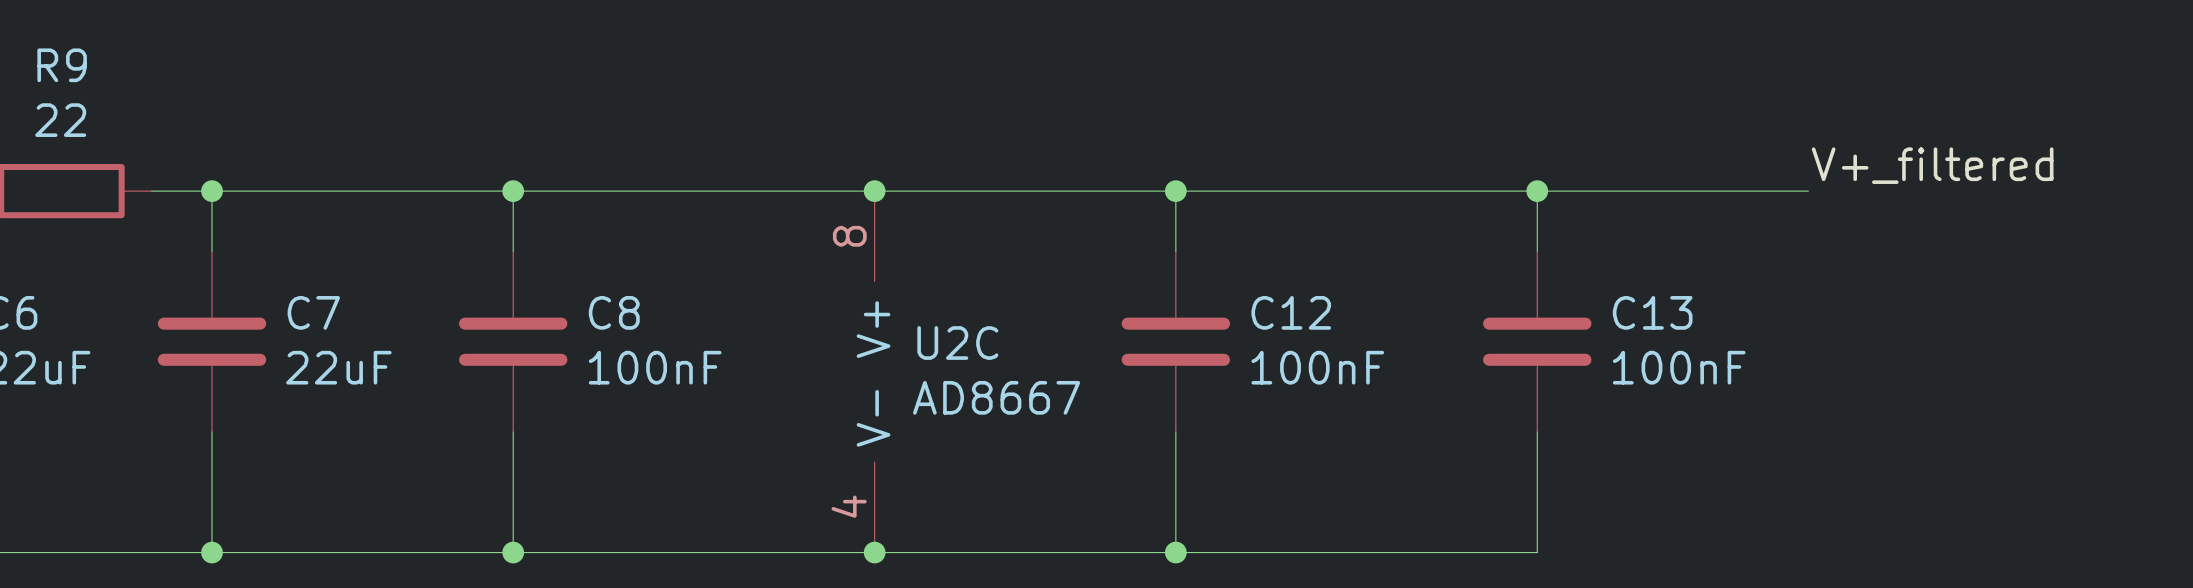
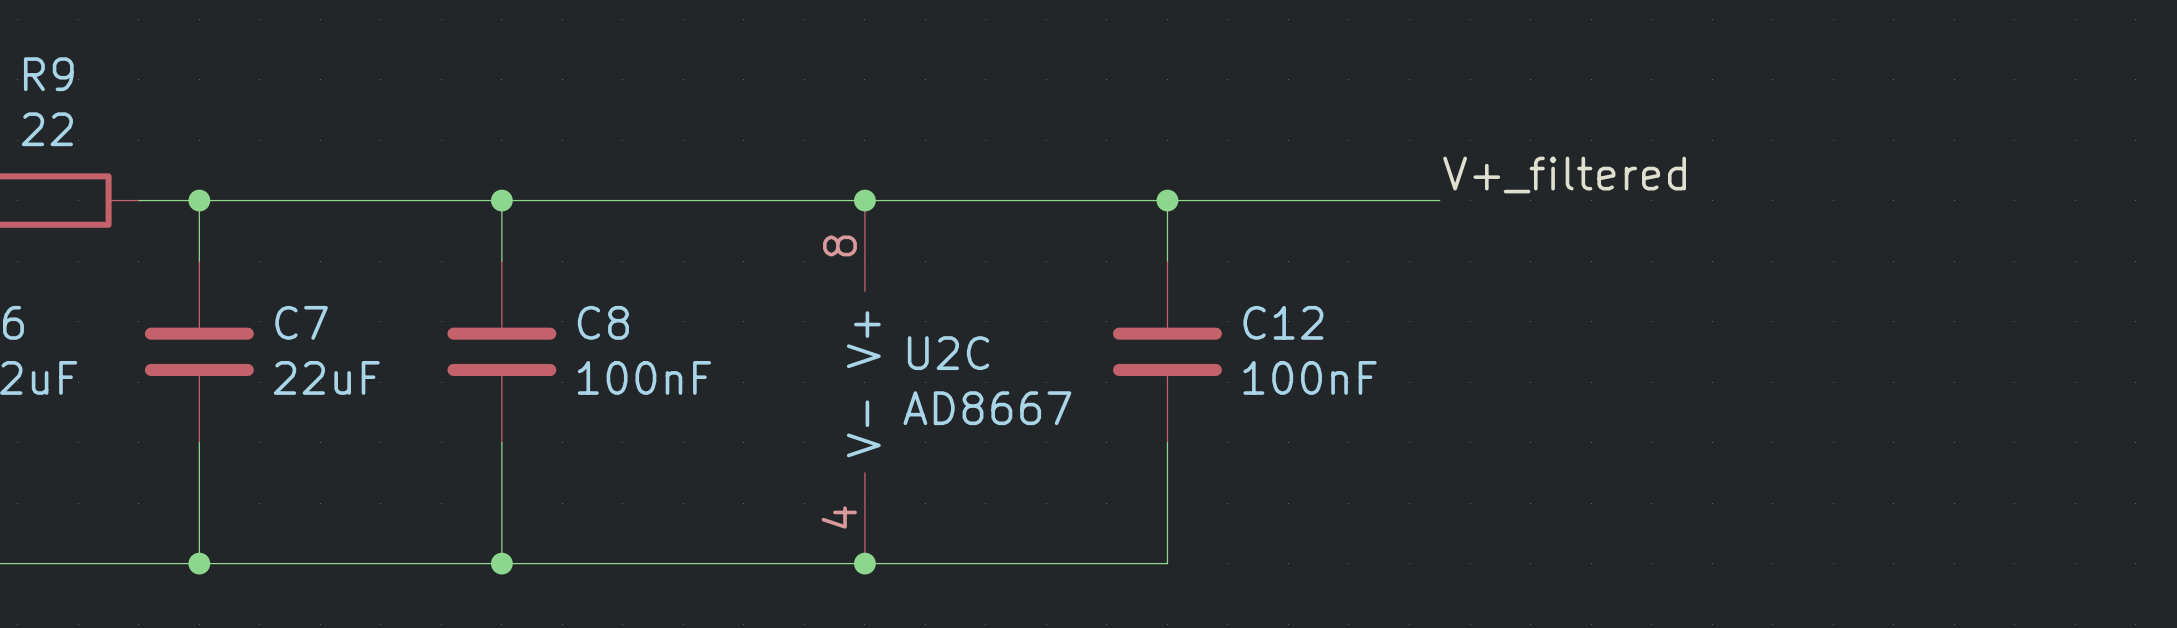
label position: V+_filtered (1932, 165) -> V+_filtered (1564, 175)
wire: (1446, 191) (1808, 191) -> none
wire: (1537, 191) (1537, 251) -> none
junction: (1537, 191) -> none
C13: 100nF (1537, 341) -> none
wire: (1537, 432) (1537, 552) (1175, 552) -> none
junction: (1175, 552) -> none

